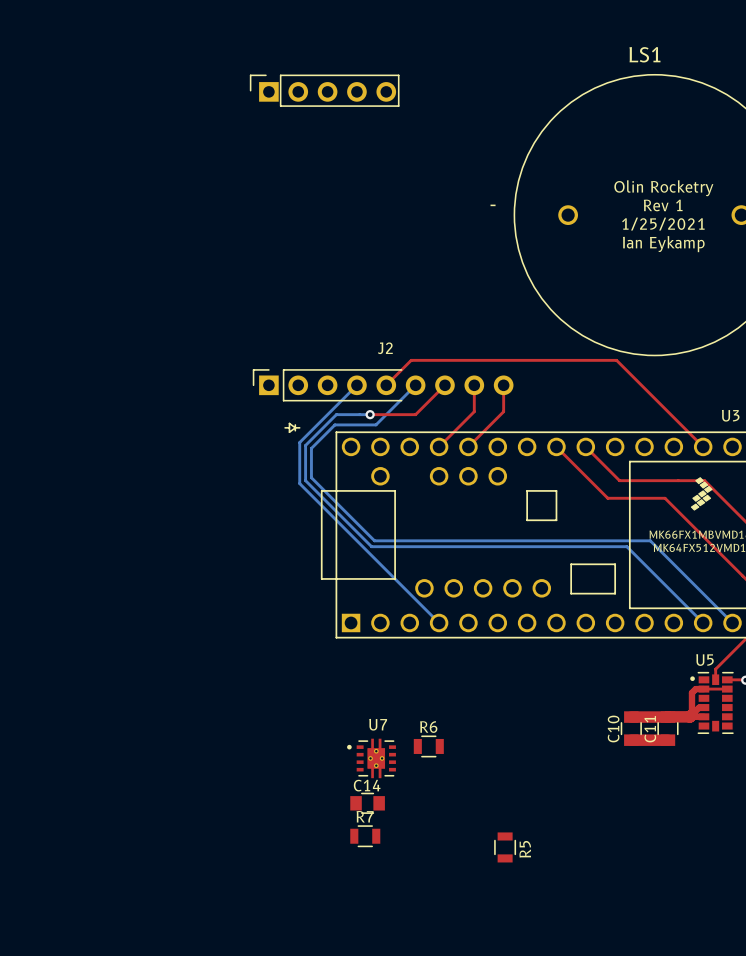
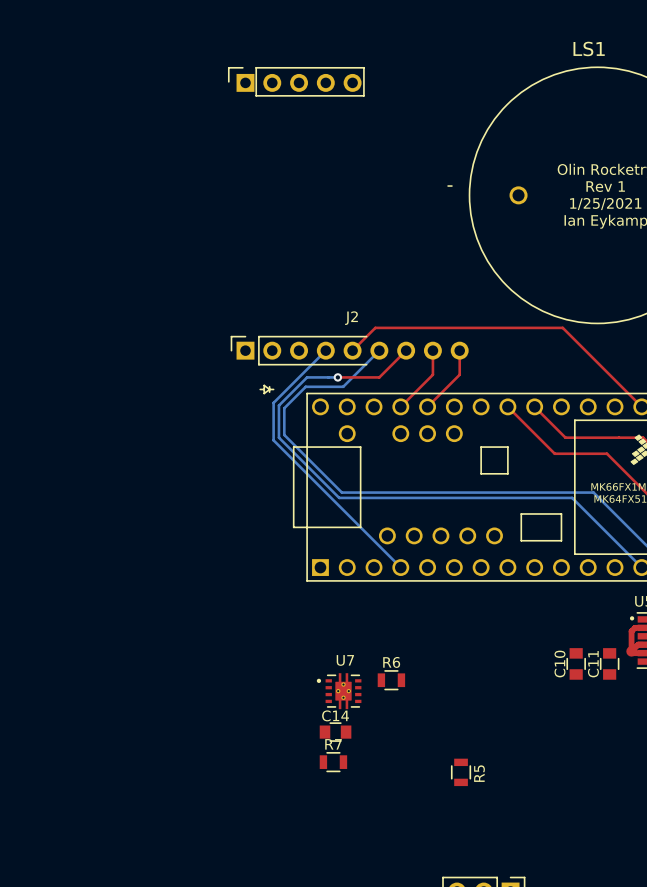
top track: (691, 714) (689, 716) (631, 717) -> none
top track: (631, 740) (667, 740) -> none

